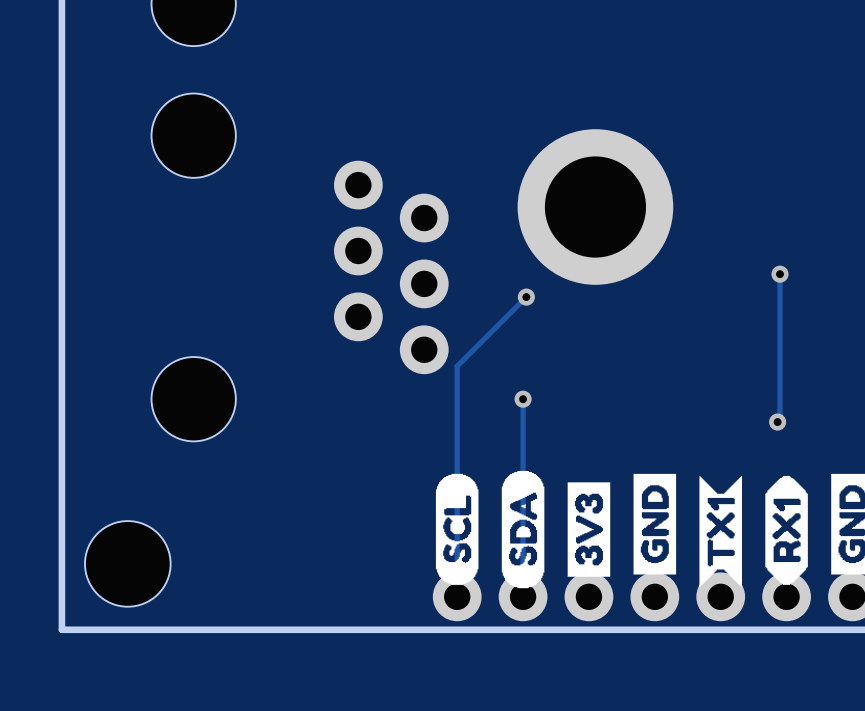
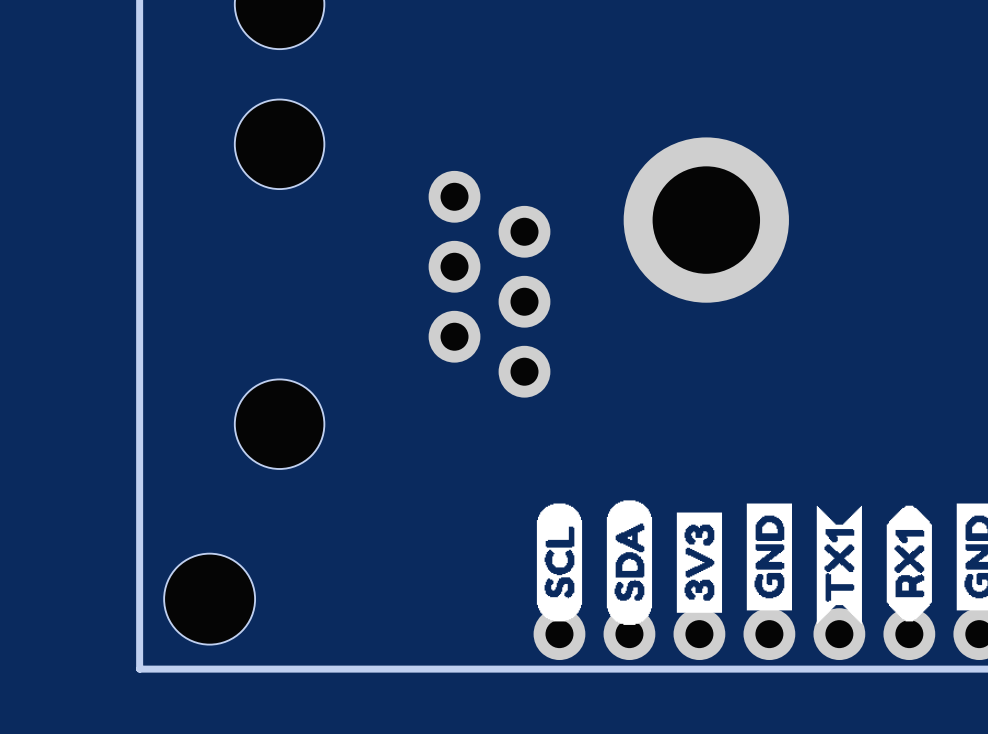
track: (780, 274) (780, 419) (777, 422) -> none
via: (780, 274) -> none
track: (526, 297) (457, 366) (457, 596) -> none
via: (526, 297) -> none
track: (523, 399) (523, 596) -> none
via: (523, 399) -> none
via: (777, 422) -> none

